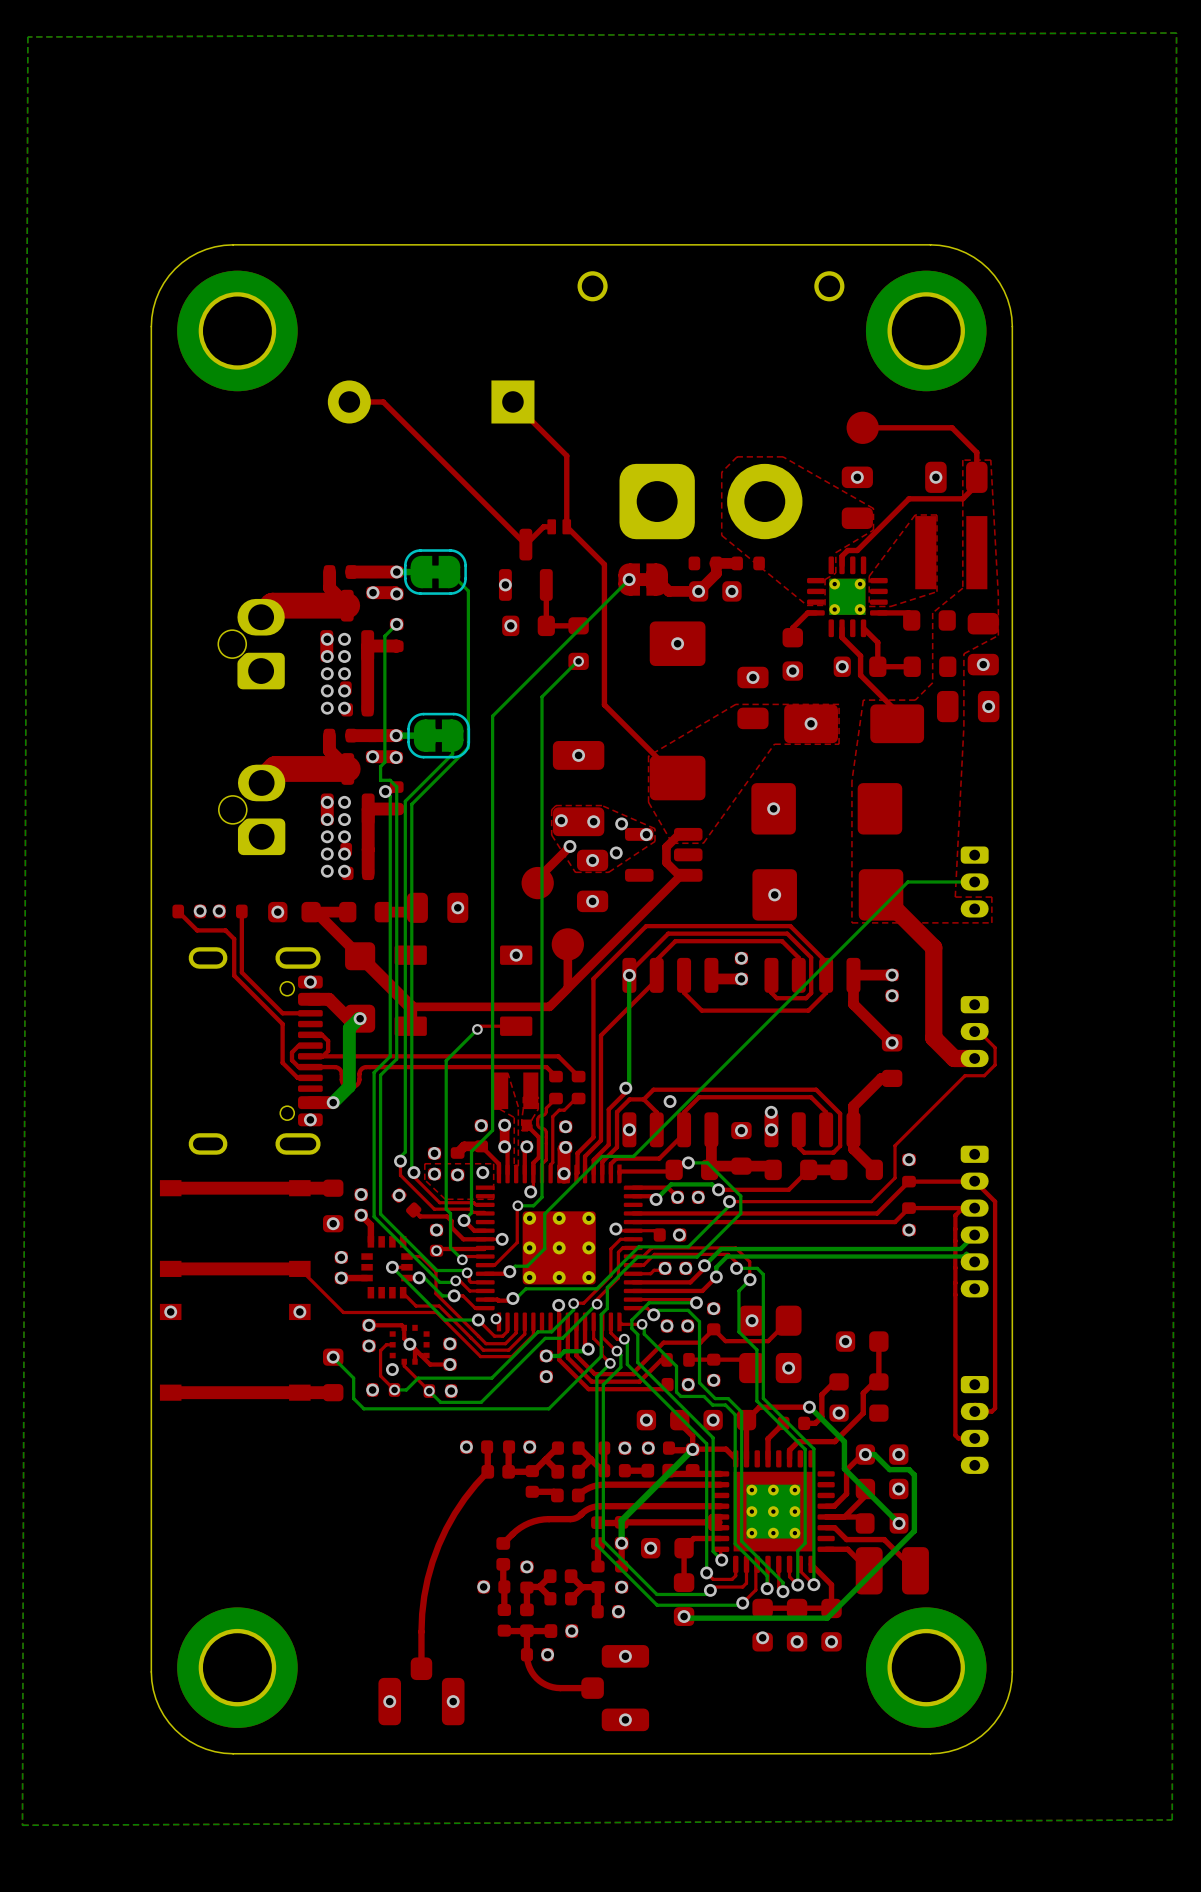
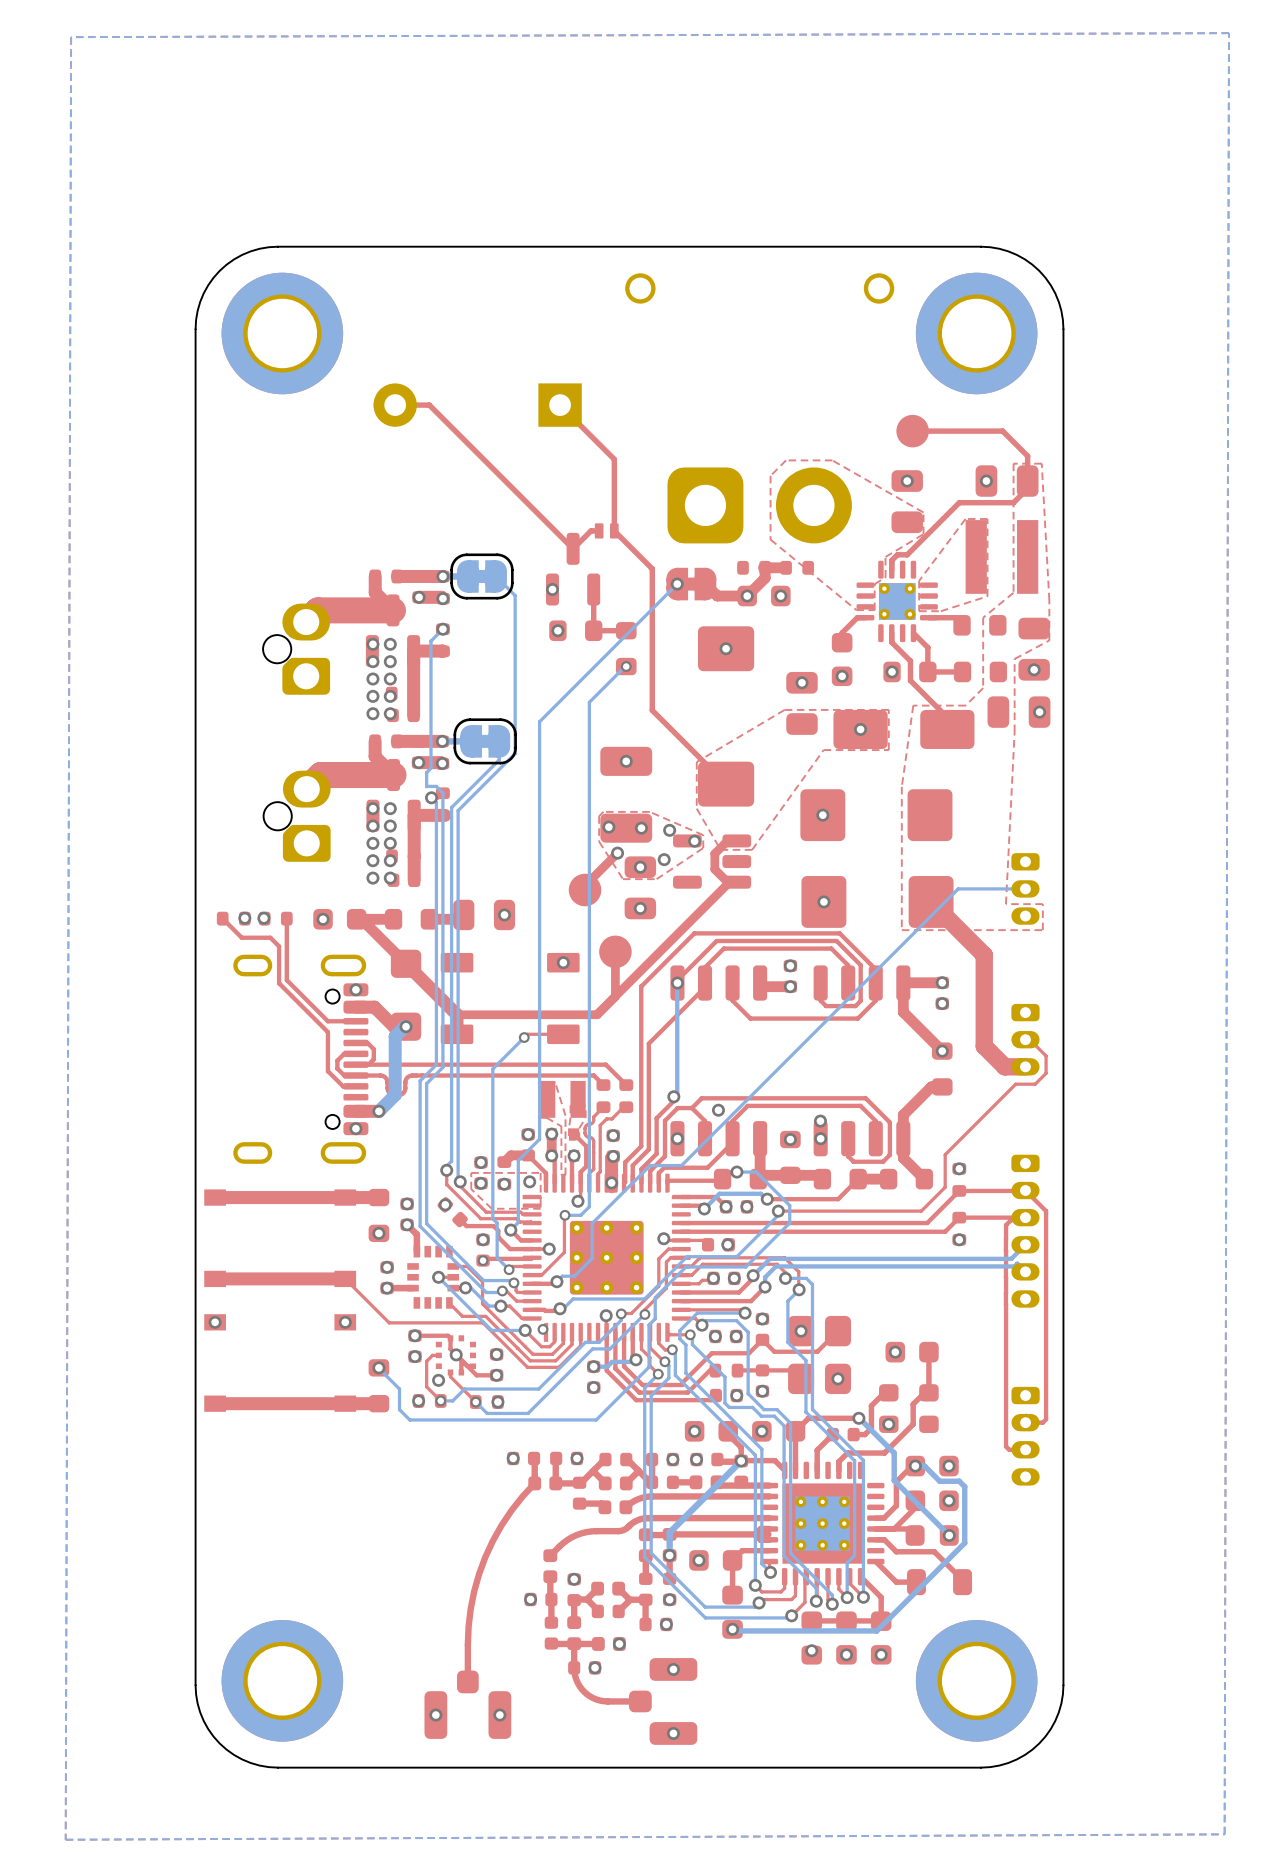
part footprint: [855, 1547, 929, 1595] -> [906, 1569, 973, 1596]
top track: (826, 1549) (847, 1549) (869, 1570) -> (875, 1561) (896, 1582) (916, 1582)

